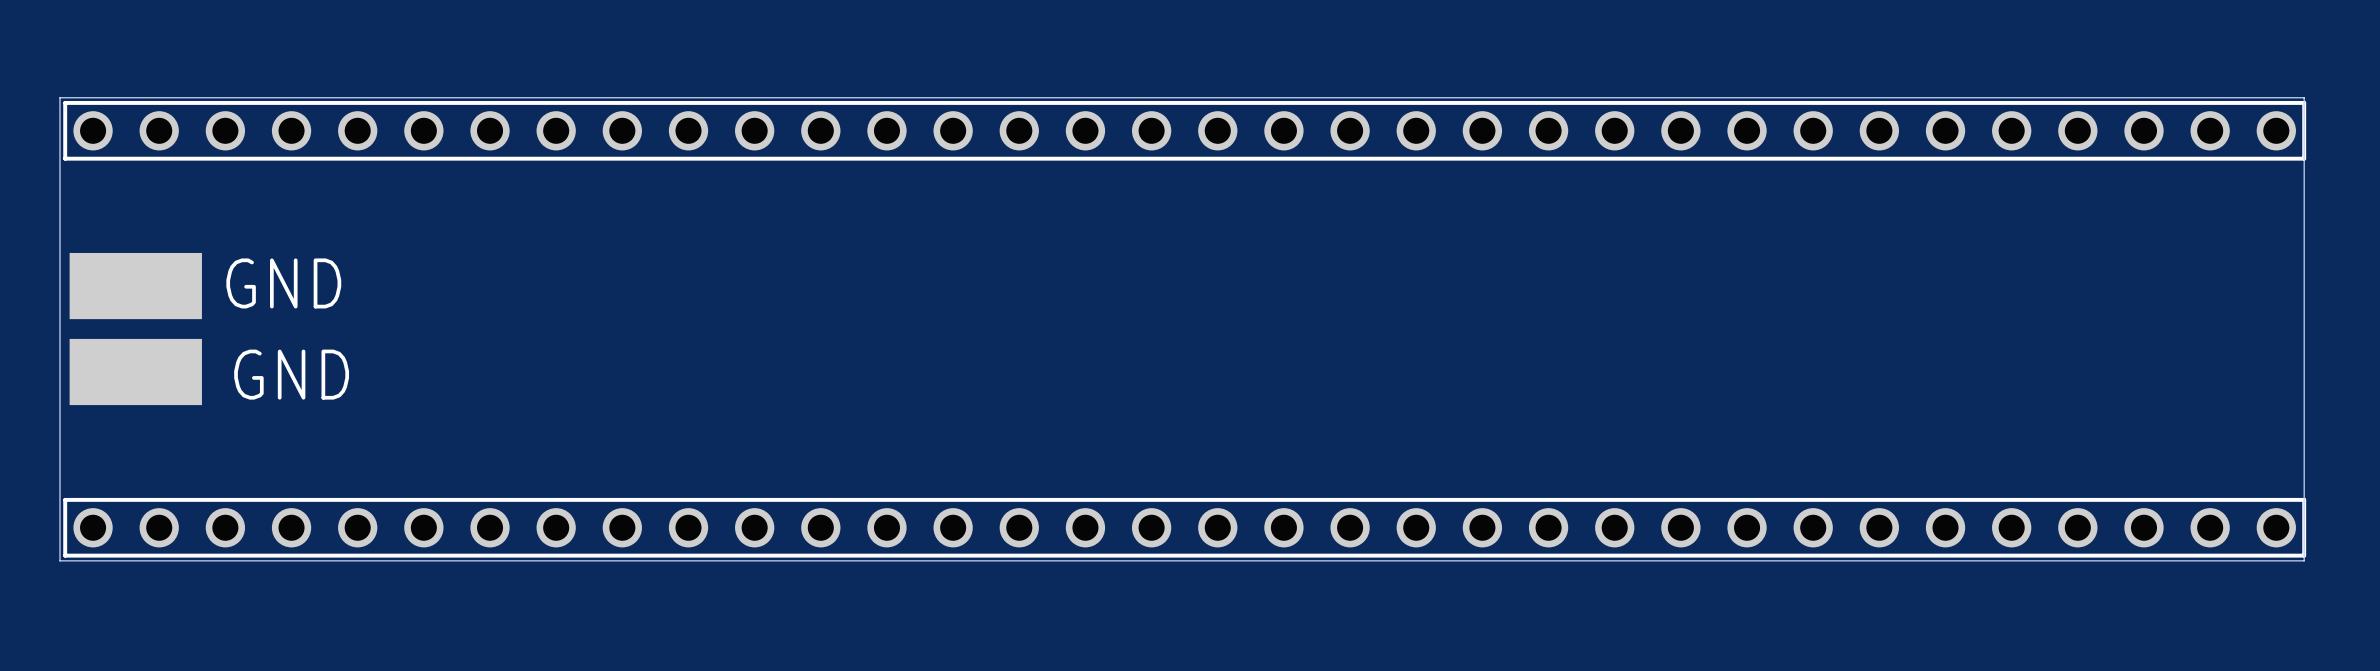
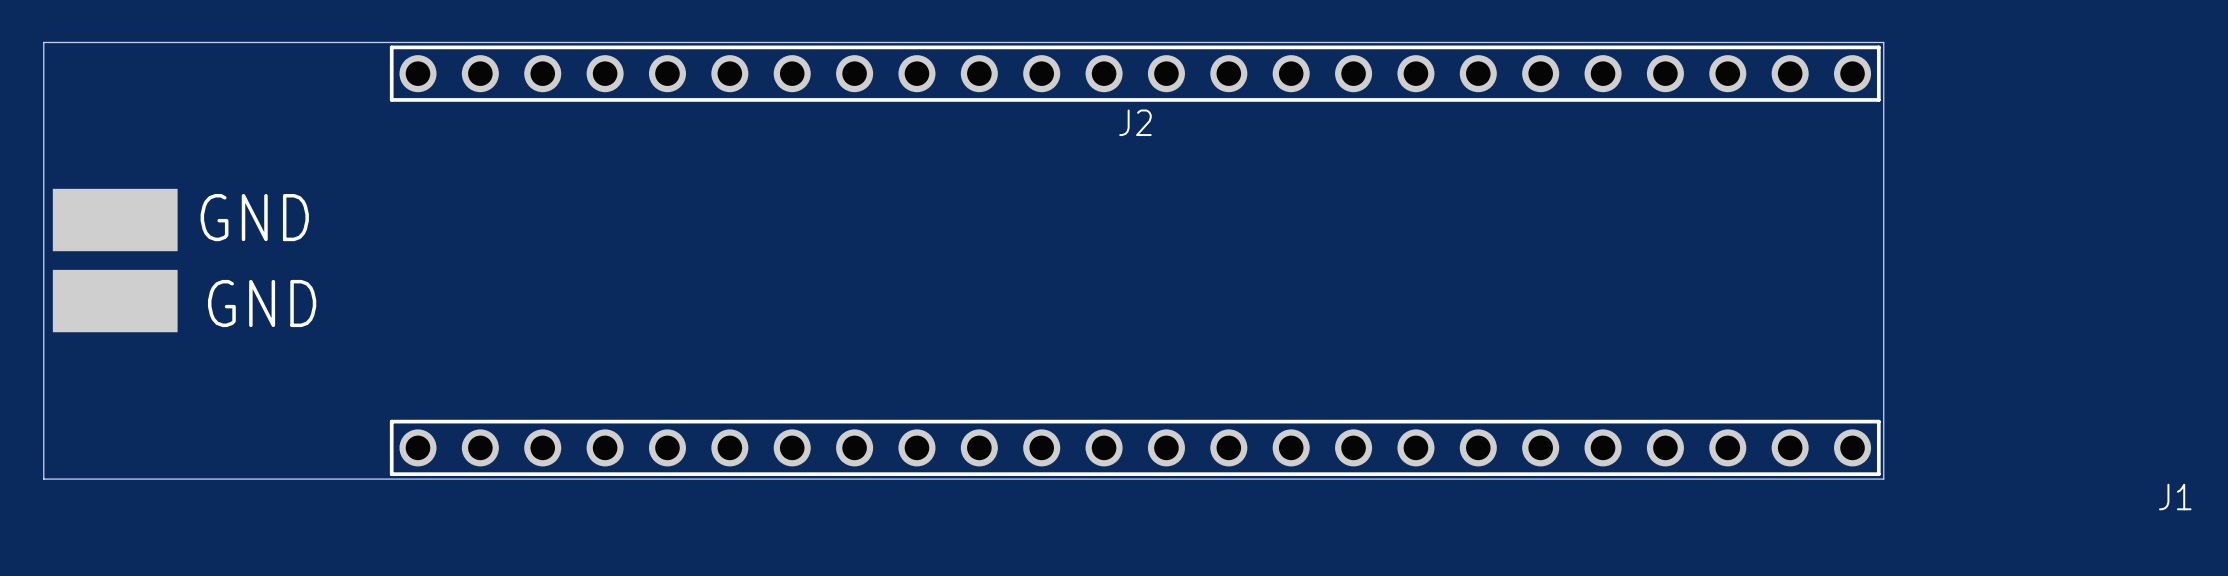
board edge: (2011, 97) (2304, 97) (2304, 560) (2011, 560) -> (1883, 42) (1883, 479)
part: (1184, 130) -> none
J2: none -> (1135, 73)
part: (1184, 527) -> none
J1: none -> (1135, 447)

